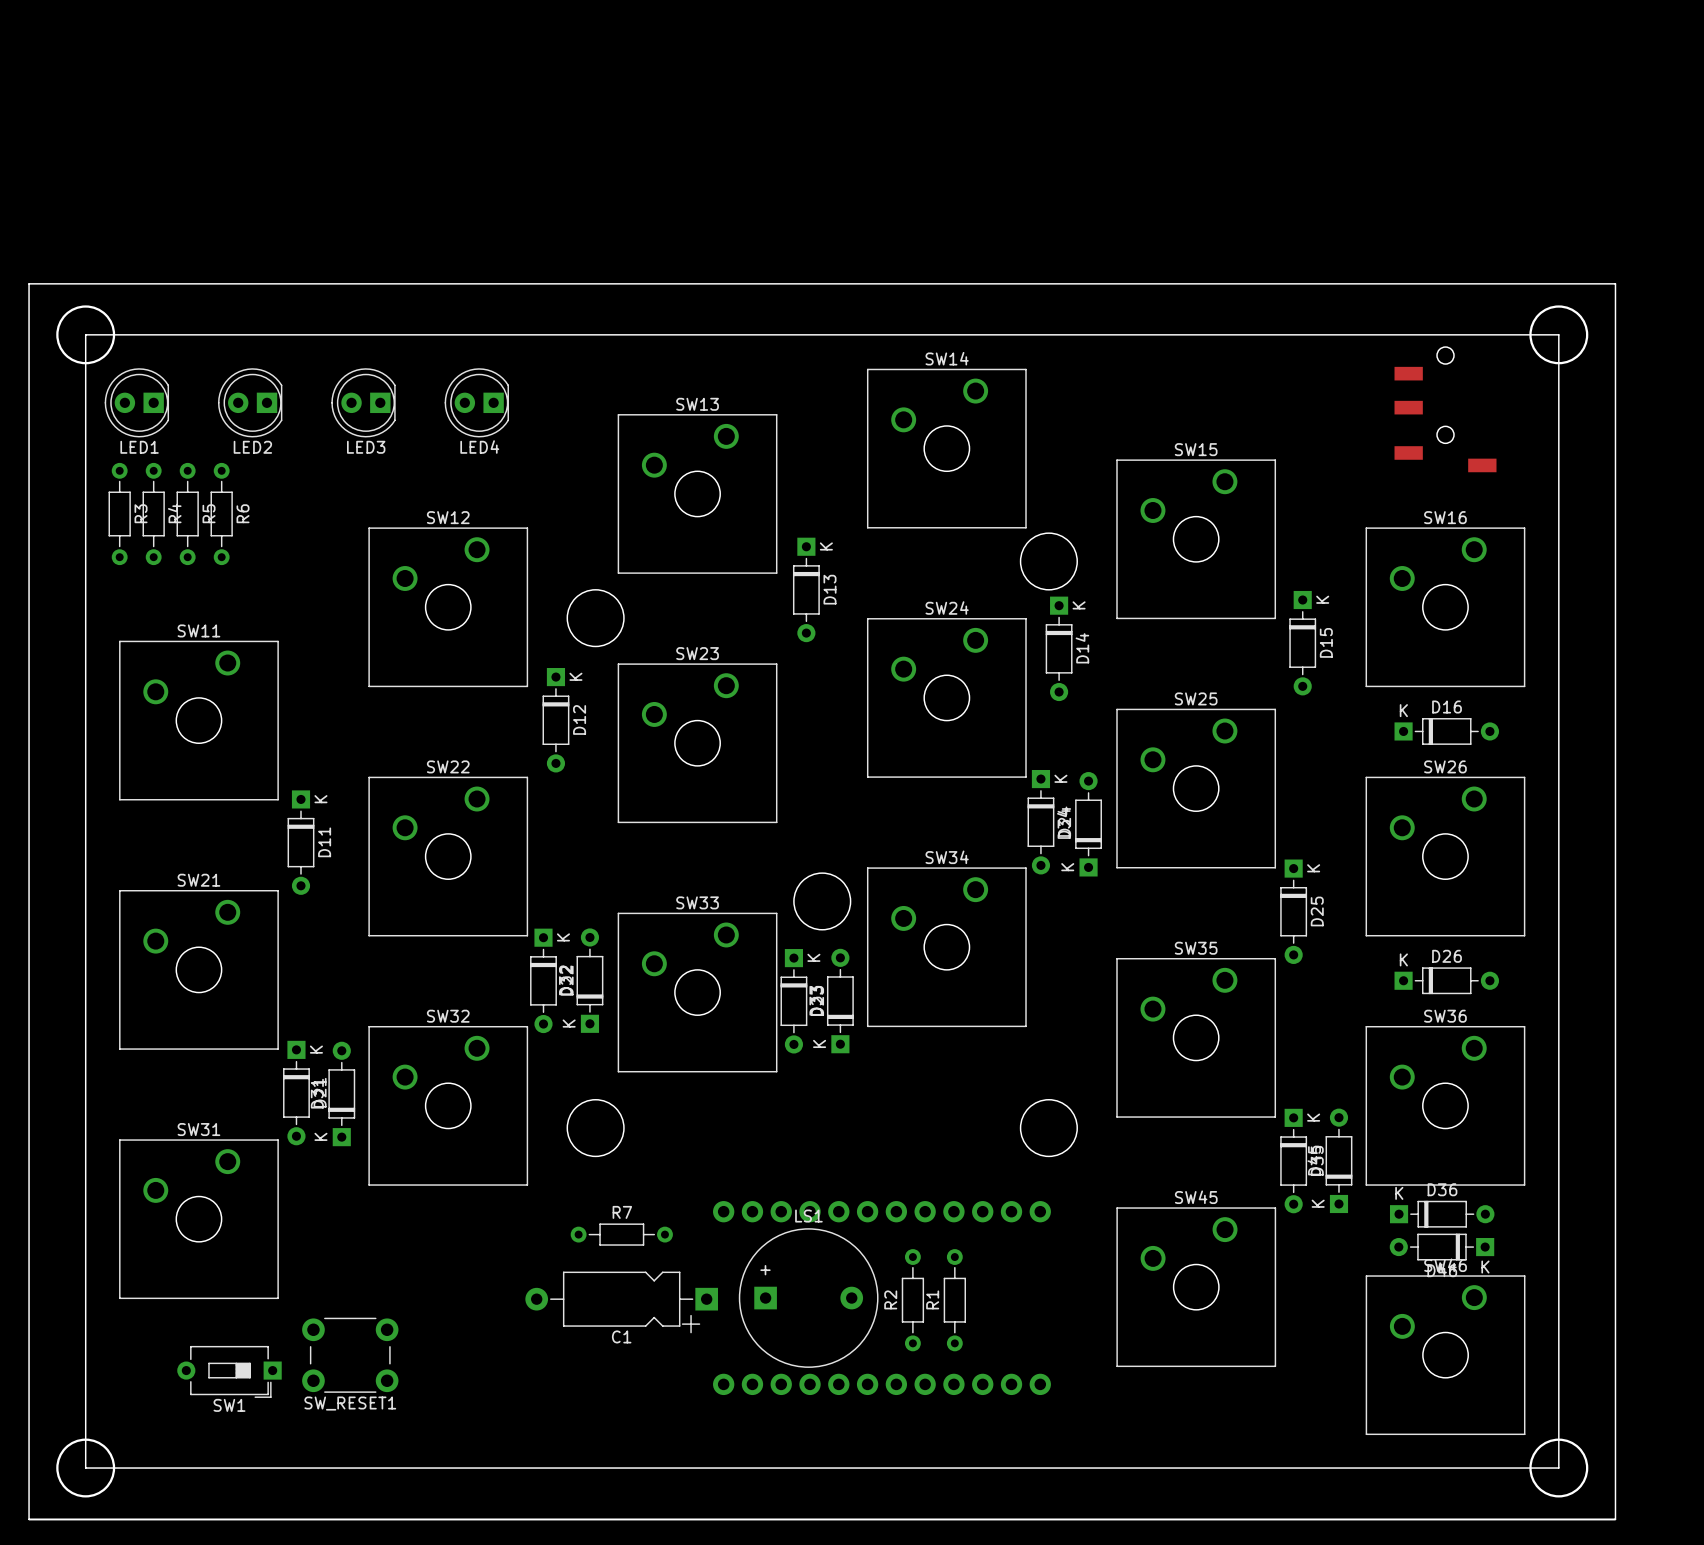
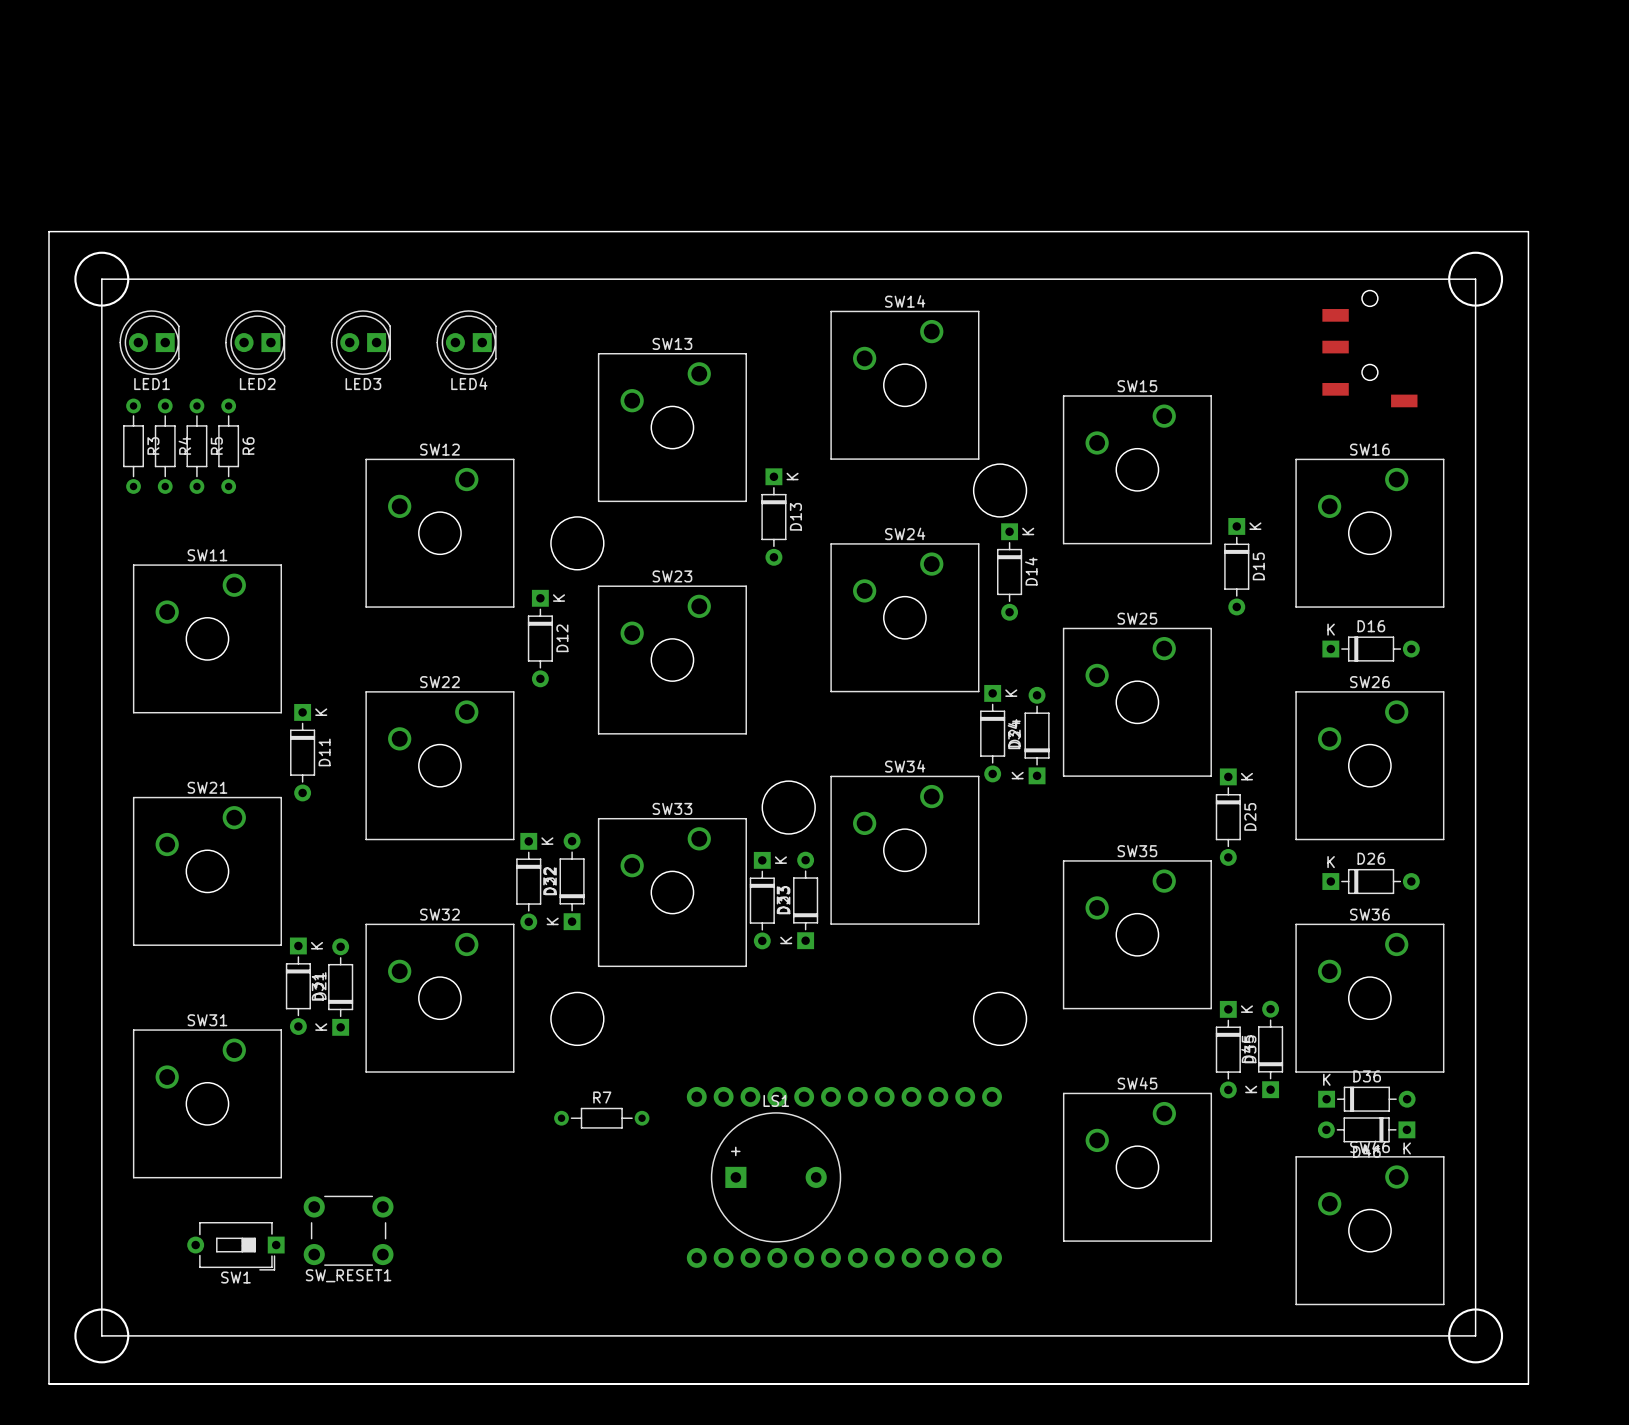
R2: (912, 1300) -> none
R1: (954, 1300) -> none
C1: (621, 1302) -> none

